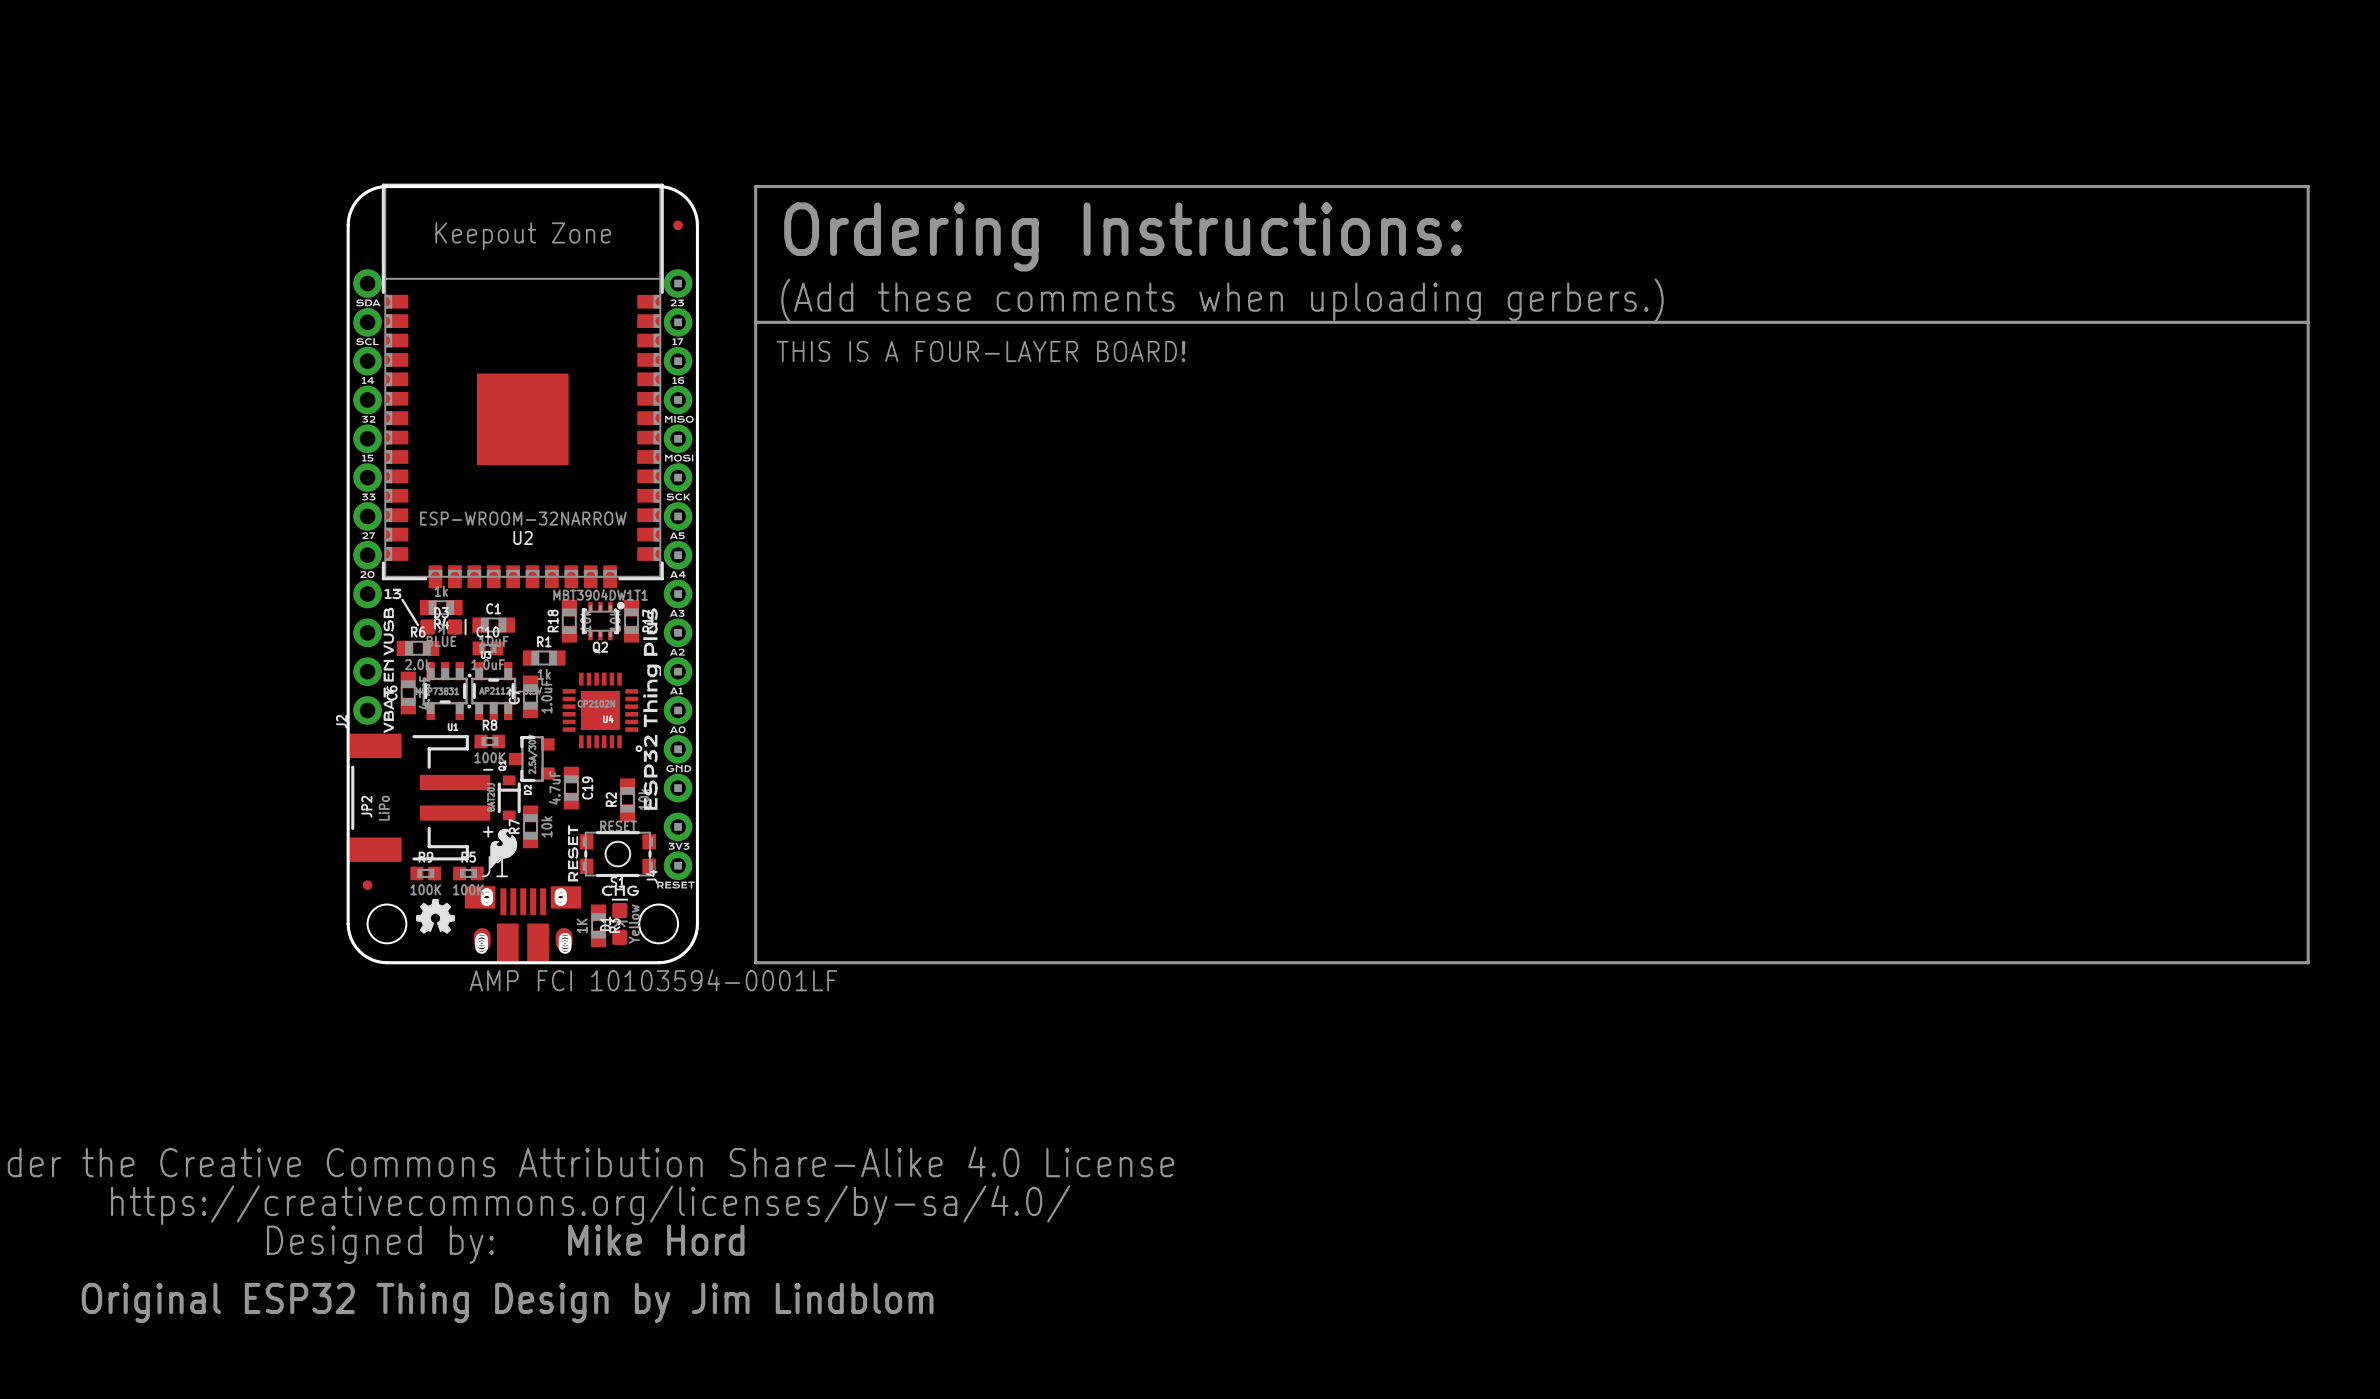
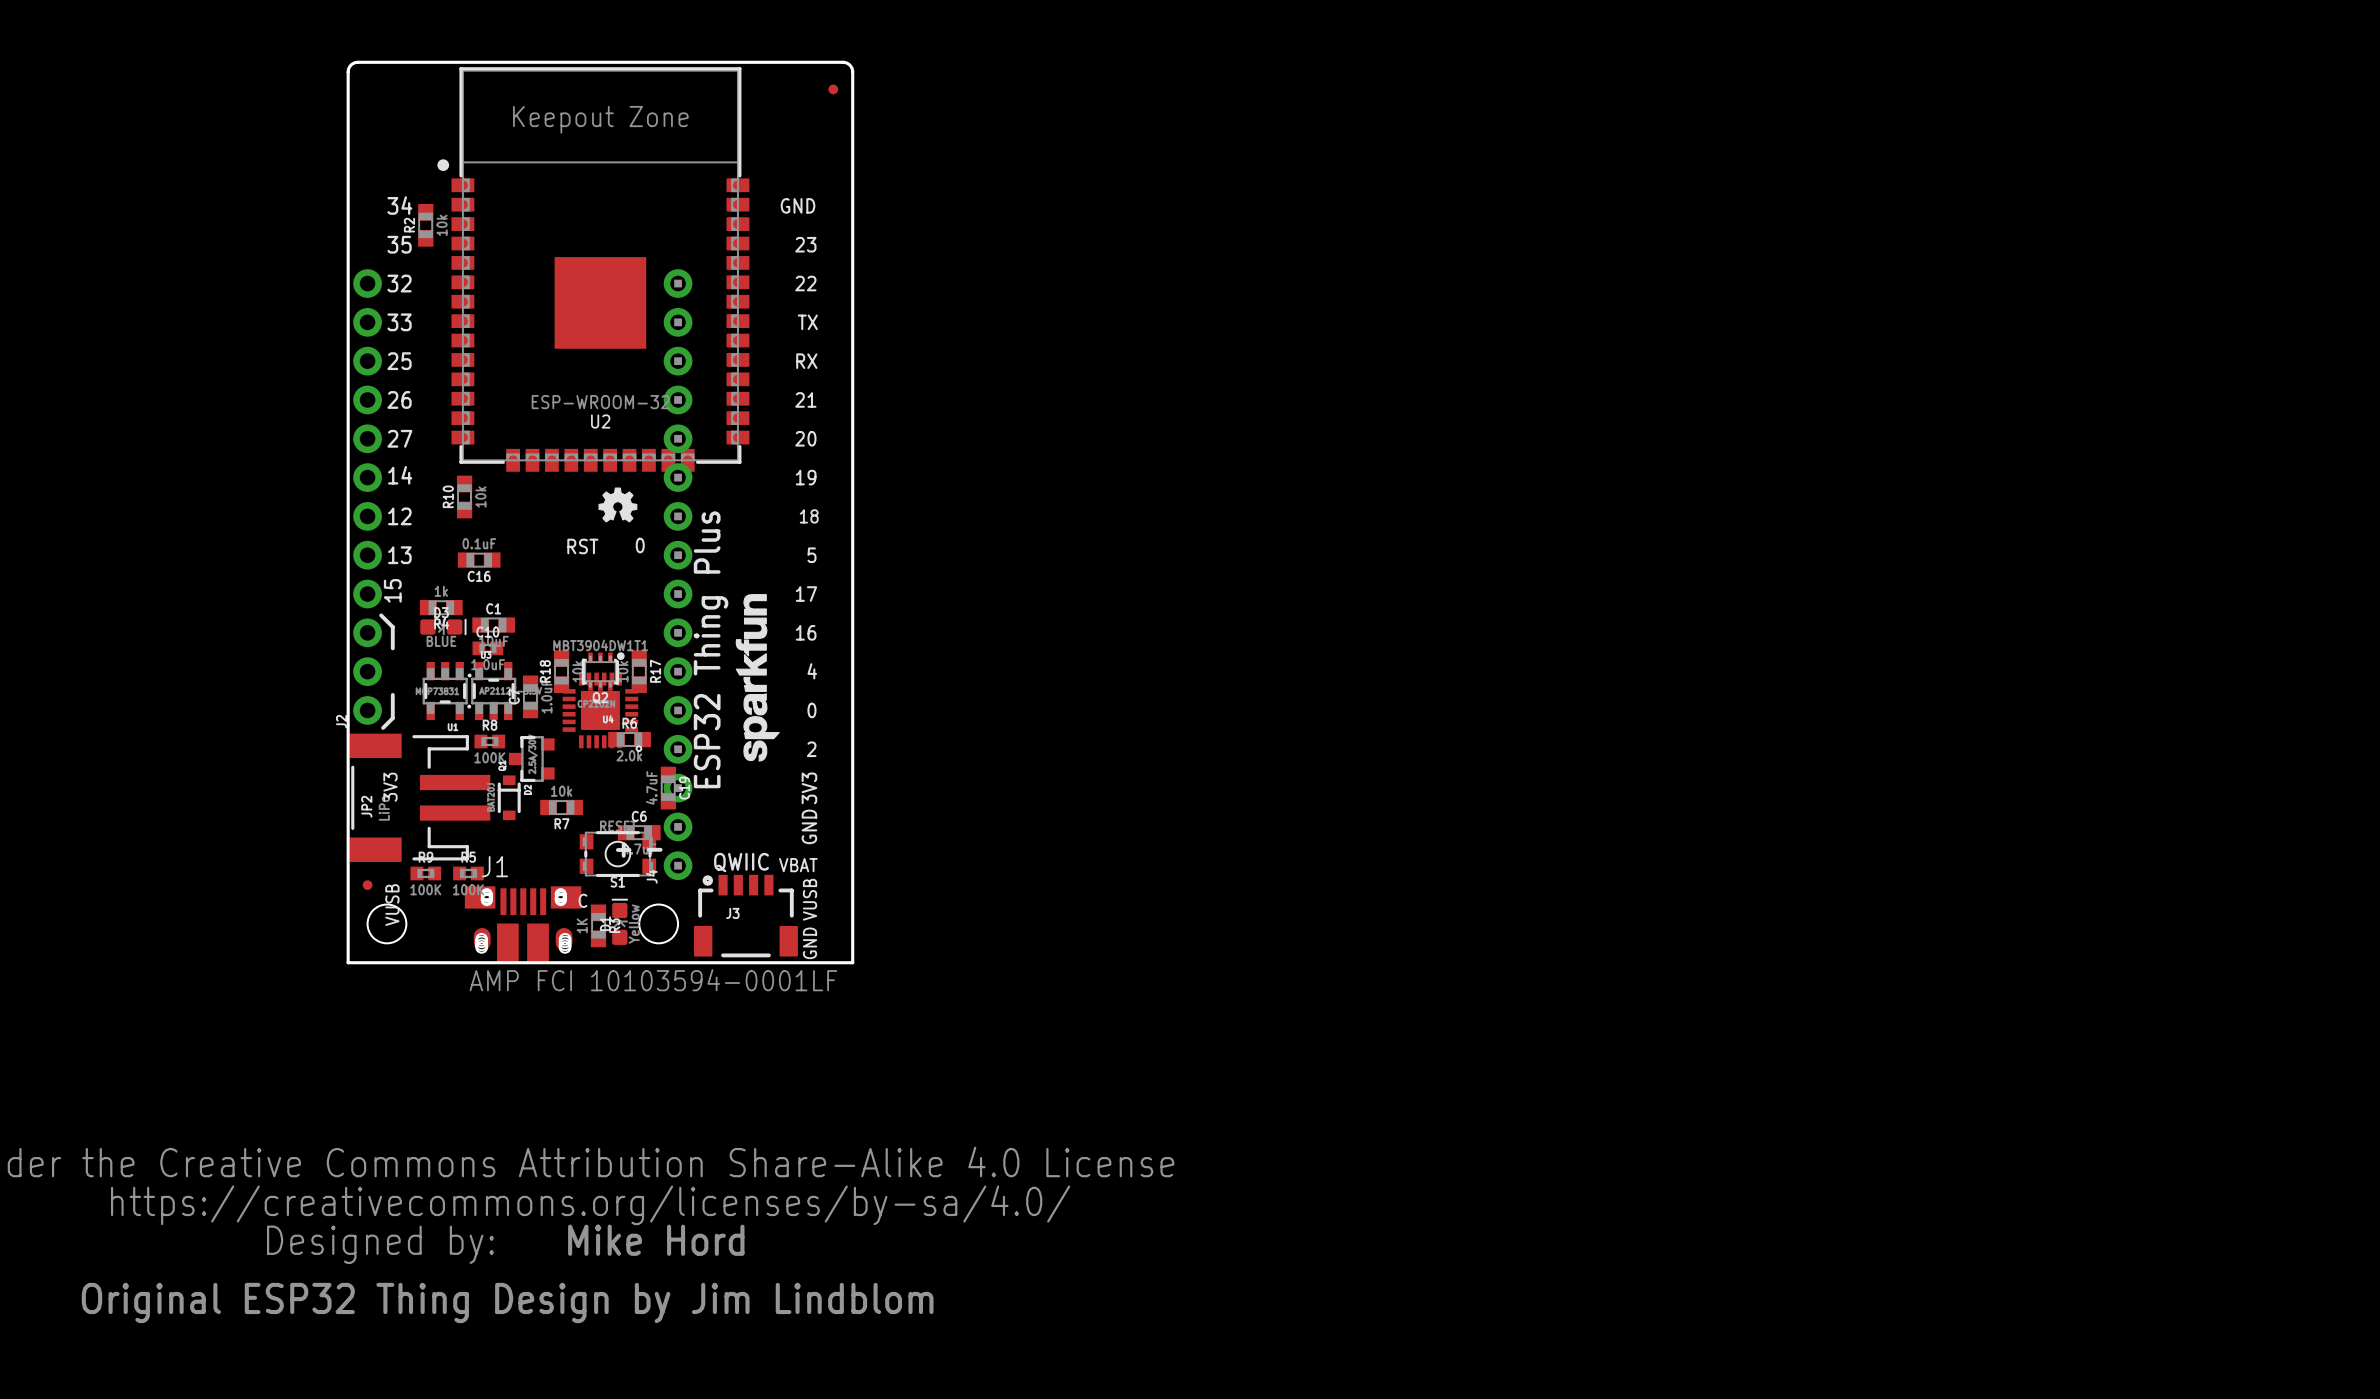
drawing: none -> [437, 159, 450, 172]
U2 footprint: [381, 183, 664, 589] -> [451, 67, 750, 472]
drawing: [754, 184, 2310, 965] -> none
text: none -> 34 (399, 205)
text: none -> GND (798, 205)
board edge: (348, 225) (351, 210) (359, 197) (372, 189) (386, 186) (663, 186) (682, 194) (694, 210) (697, 225) (697, 923) (694, 938) (686, 951) (673, 959) (658, 962) -> (348, 225) (348, 72) (350, 66) (355, 62) (843, 62) (848, 64) (851, 68) (852, 962) (658, 962)
part position: (678, 225) -> (833, 89)
text: none -> 35 (399, 244)
text: none -> 23 (805, 244)
text: none -> 32 (399, 283)
text: none -> 22 (805, 283)
drawing: [356, 299, 381, 307] -> none
drawing: [670, 299, 685, 307] -> none
text: none -> 33 (399, 322)
text: none -> TX (807, 322)
drawing: [356, 338, 379, 346] -> none
drawing: [672, 338, 684, 346] -> none
text: none -> 25 (399, 361)
text: none -> RX (806, 361)
drawing: [362, 377, 375, 384] -> none
drawing: [672, 377, 685, 385] -> none
text: none -> 26 (399, 399)
text: none -> 21 (805, 399)
drawing: [362, 415, 376, 423] -> none
drawing: [665, 415, 694, 423] -> none
text: none -> 27 (399, 438)
text: none -> 20 (805, 438)
drawing: [362, 454, 374, 462] -> none
drawing: [665, 454, 694, 462] -> none
text: none -> 14 (400, 475)
text: none -> 19 (806, 477)
drawing: none -> [598, 487, 638, 523]
drawing: [362, 493, 376, 501] -> none
drawing: [666, 493, 691, 501] -> none
R10: none -> 10k (464, 497)
text: none -> 12 (399, 516)
text: none -> 18 (809, 516)
U2 value: ESP-WROOM-32NARROW (523, 518) -> ESP-WROOM-32 (600, 402)
drawing: [362, 532, 376, 540] -> none
drawing: [669, 532, 685, 540] -> none
text: none -> 0 (640, 545)
text: none -> RST (582, 546)
text: none -> 13 (399, 555)
text: none -> 5 (811, 555)
C16: none -> 0.1uF (479, 560)
drawing: [360, 571, 402, 734] -> none
drawing: [670, 571, 686, 578] -> none
text: none -> 15 (392, 590)
drawing: none -> [735, 594, 780, 762]
text: none -> 17 (806, 594)
line: (402, 599) (418, 625) -> none
drawing: [643, 608, 692, 810] -> none
line: none -> (381, 615) (392, 627) (392, 648)
R18 position: (569, 621) -> (561, 671)
Q2 position: (603, 621) -> (603, 671)
R17 position: (631, 621) -> (639, 671)
text: none -> 16 (806, 632)
R6 position: (418, 648) -> (629, 739)
text: none -> ESP32 Thing Plus (711, 649)
R1: 1k (544, 658) -> none
text: none -> 4 (812, 671)
C6 rotation: 0° (408, 692) -> 90° clockwise (639, 832)
C6 position: (408, 692) -> (639, 832)
line: none -> (392, 694) (392, 718) (383, 727)
text: none -> 0 (811, 710)
text: none -> 2 (811, 749)
text: - (488, 769) -> none
text: none -> 3V3 (390, 787)
C19 position: (571, 788) -> (668, 788)
text: none -> 3V3 (809, 788)
R2 position: (627, 799) -> (425, 225)
drawing: [567, 825, 579, 882] -> none
R7 rotation: 0° (530, 826) -> 90° clockwise (561, 807)
R7 position: (530, 826) -> (561, 807)
text: none -> GND (809, 826)
drawing: [490, 828, 518, 869] -> none
text: + (488, 831) -> none
drawing: [668, 842, 690, 850] -> none
line: none -> (623, 844) (623, 855)
line: none -> (617, 849) (629, 849)
line: none -> (648, 849) (660, 849)
text: none -> QWIIC (741, 862)
text: none -> VBAT (798, 865)
drawing: [657, 881, 695, 889] -> none
drawing: [601, 885, 639, 897] -> none
drawing: [416, 898, 455, 934] -> none
text: none -> VUSB (810, 899)
text: none -> C (582, 900)
text: none -> VUSB (392, 905)
J3: none -> (745, 916)
board edge: (348, 923) (351, 938) (359, 951) (372, 959) (386, 962) -> (348, 923) (348, 962) (386, 962)
text: none -> GND (810, 943)

